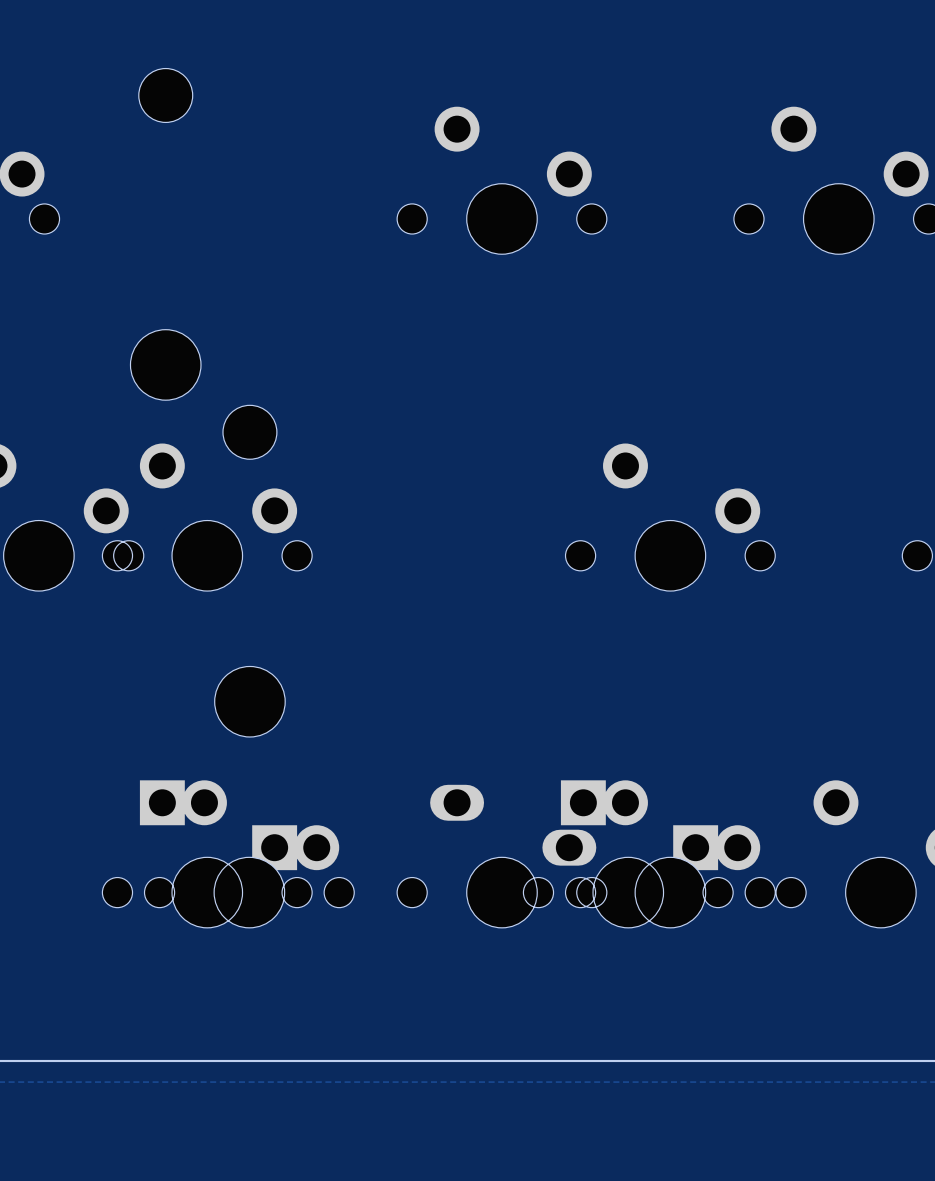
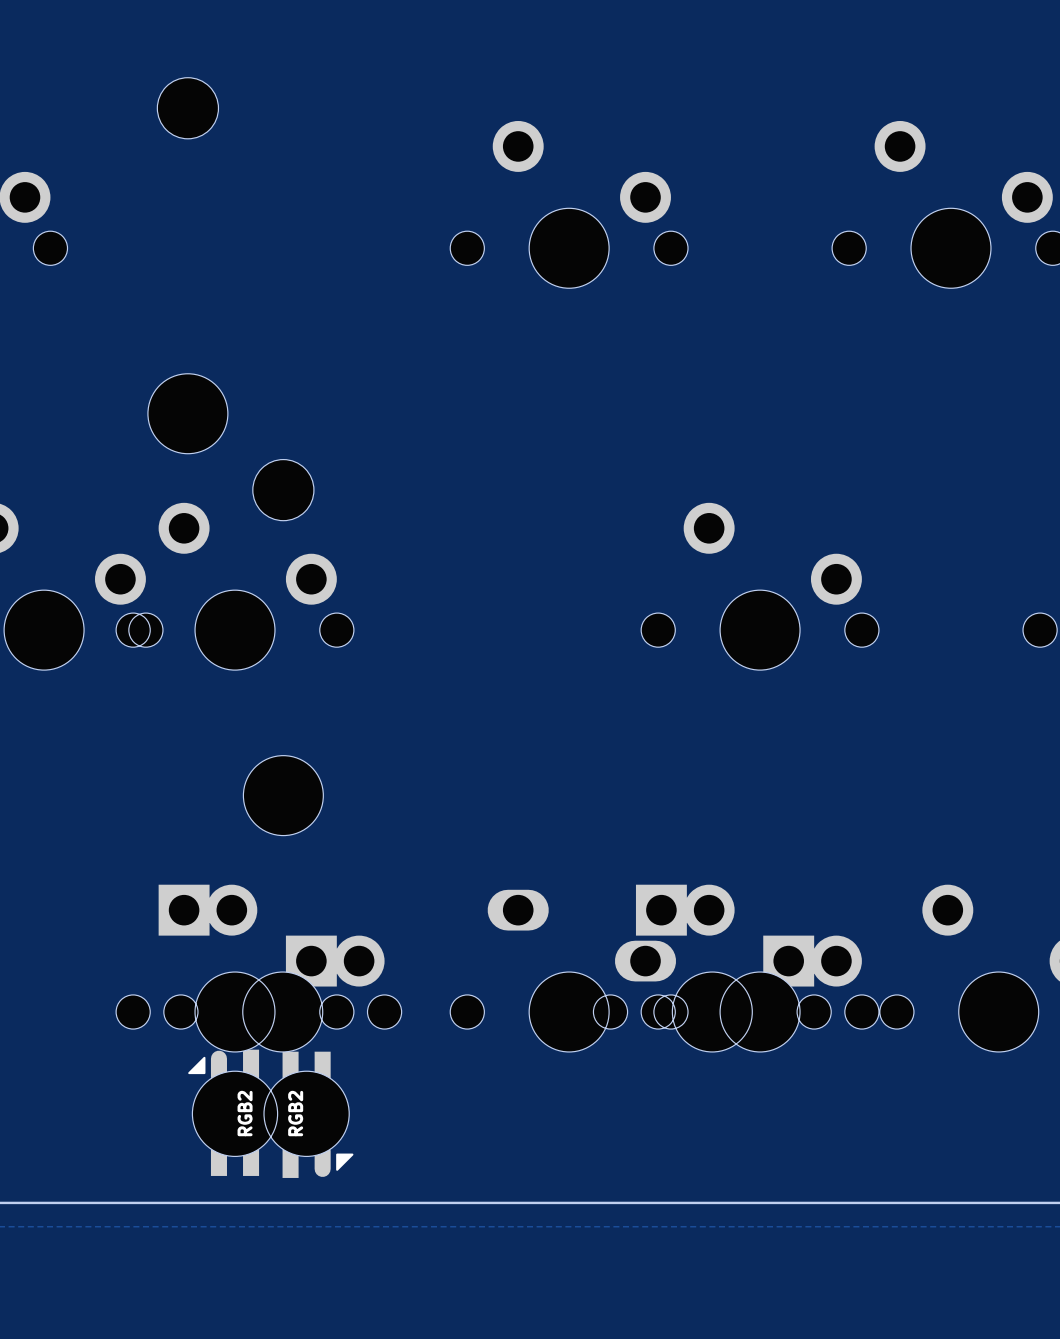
RGB2: none -> (232, 1112)
RGB2: none -> (308, 1114)

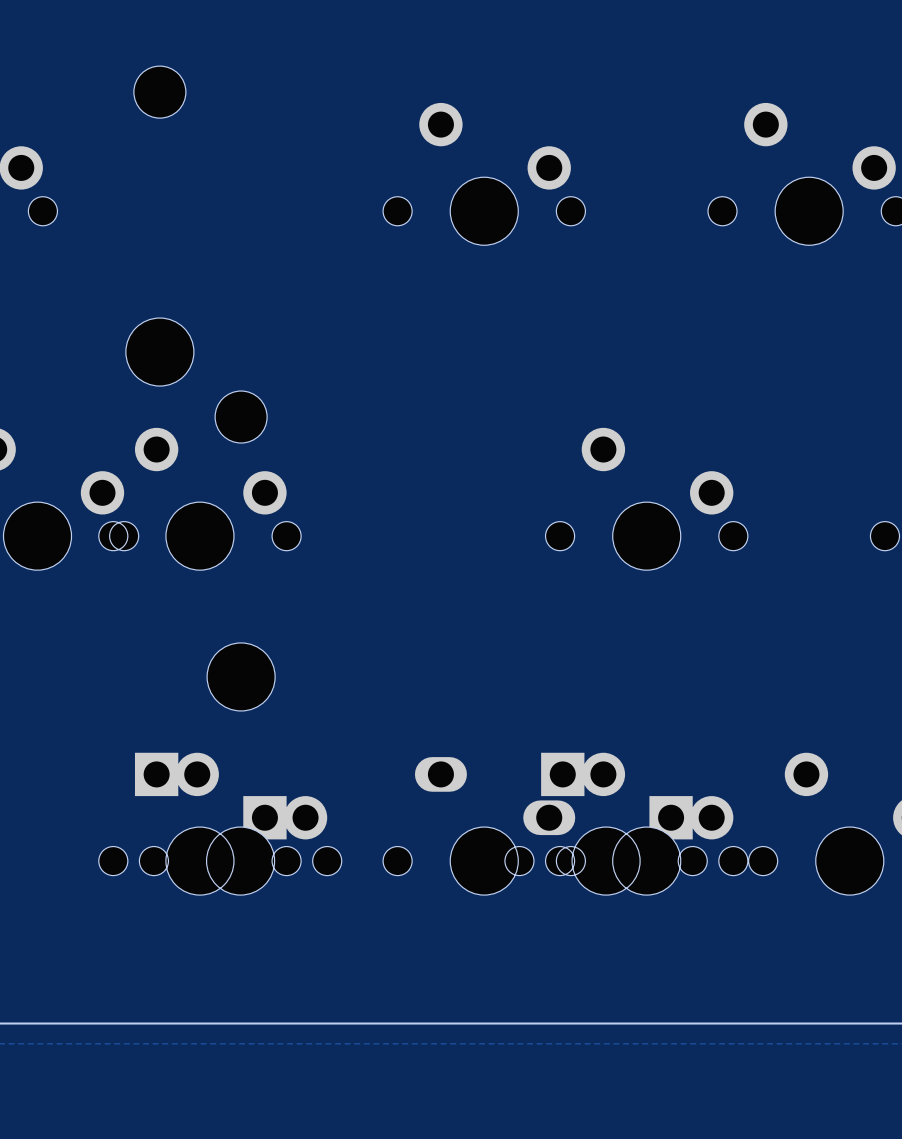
RGB2: (232, 1112) -> none
RGB2: (308, 1114) -> none

